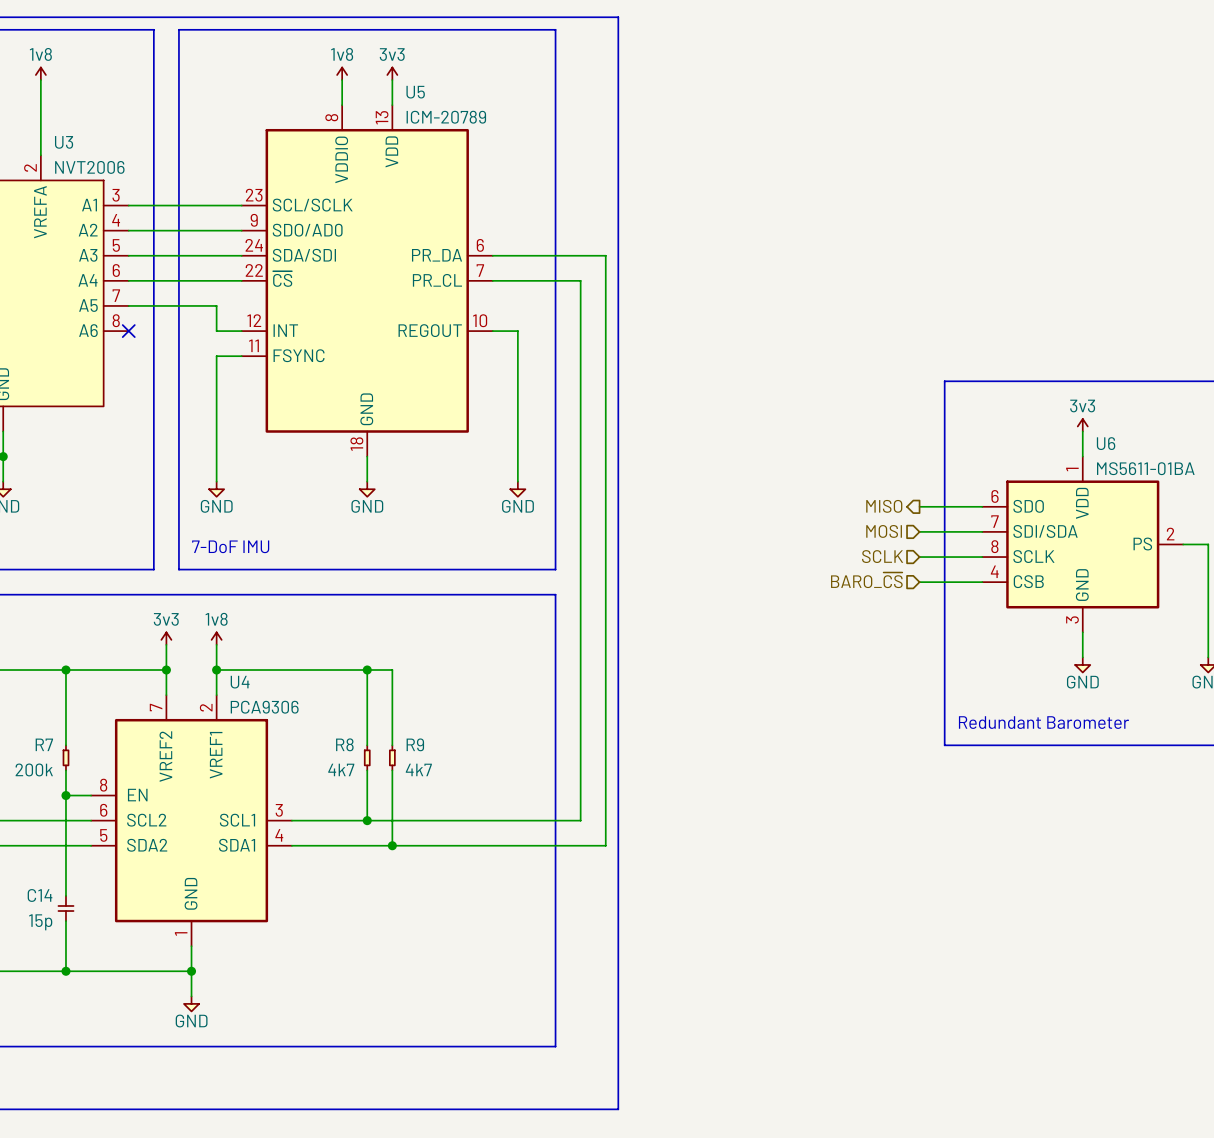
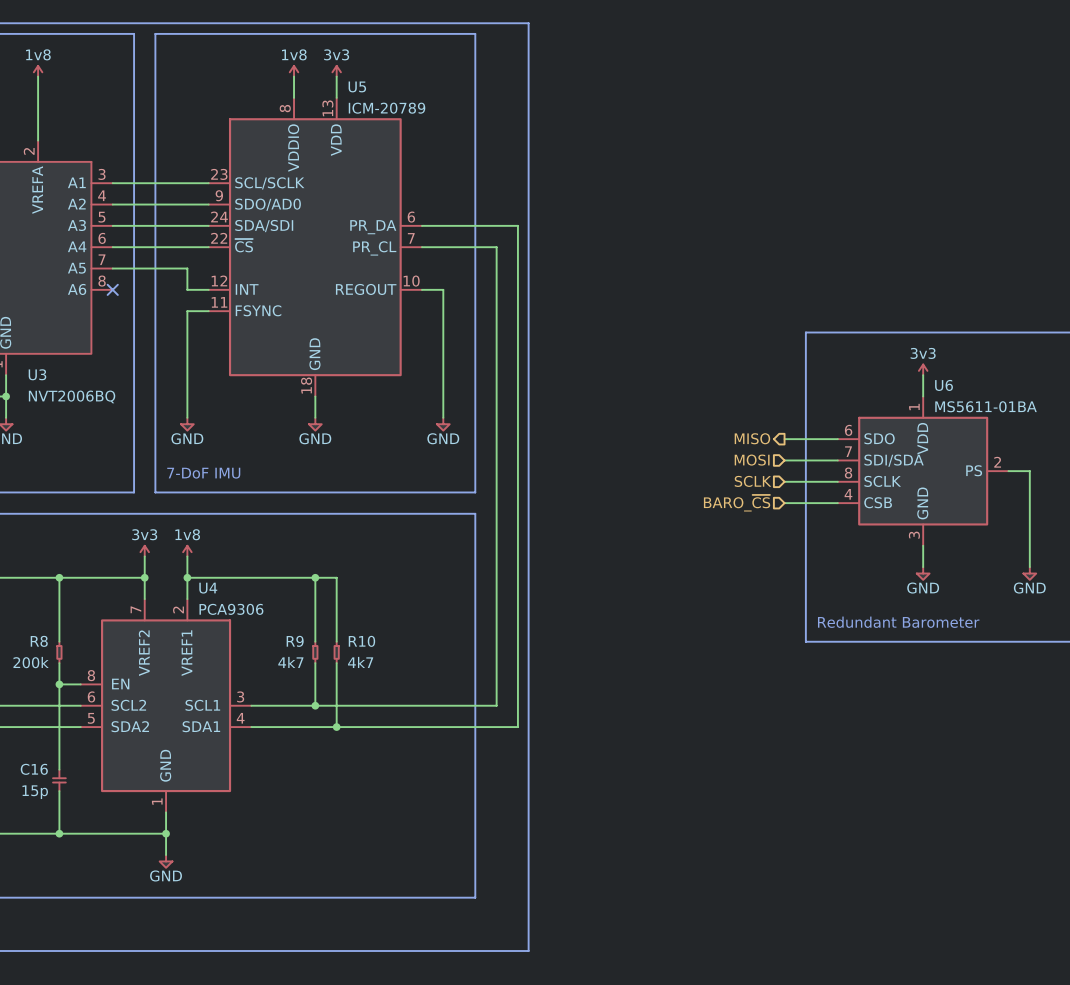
U3 name position: U3 (64, 142) -> U3 (37, 374)
U3 value: NVT2006 (89, 167) -> NVT2006BQ (72, 396)
R7 name: R7 (44, 744) -> R8 (39, 641)
R8 name: R8 (344, 744) -> R9 (295, 641)
R9 name: R9 (415, 744) -> R10 (361, 641)
C14 name: C14 (40, 895) -> C16 (34, 769)

